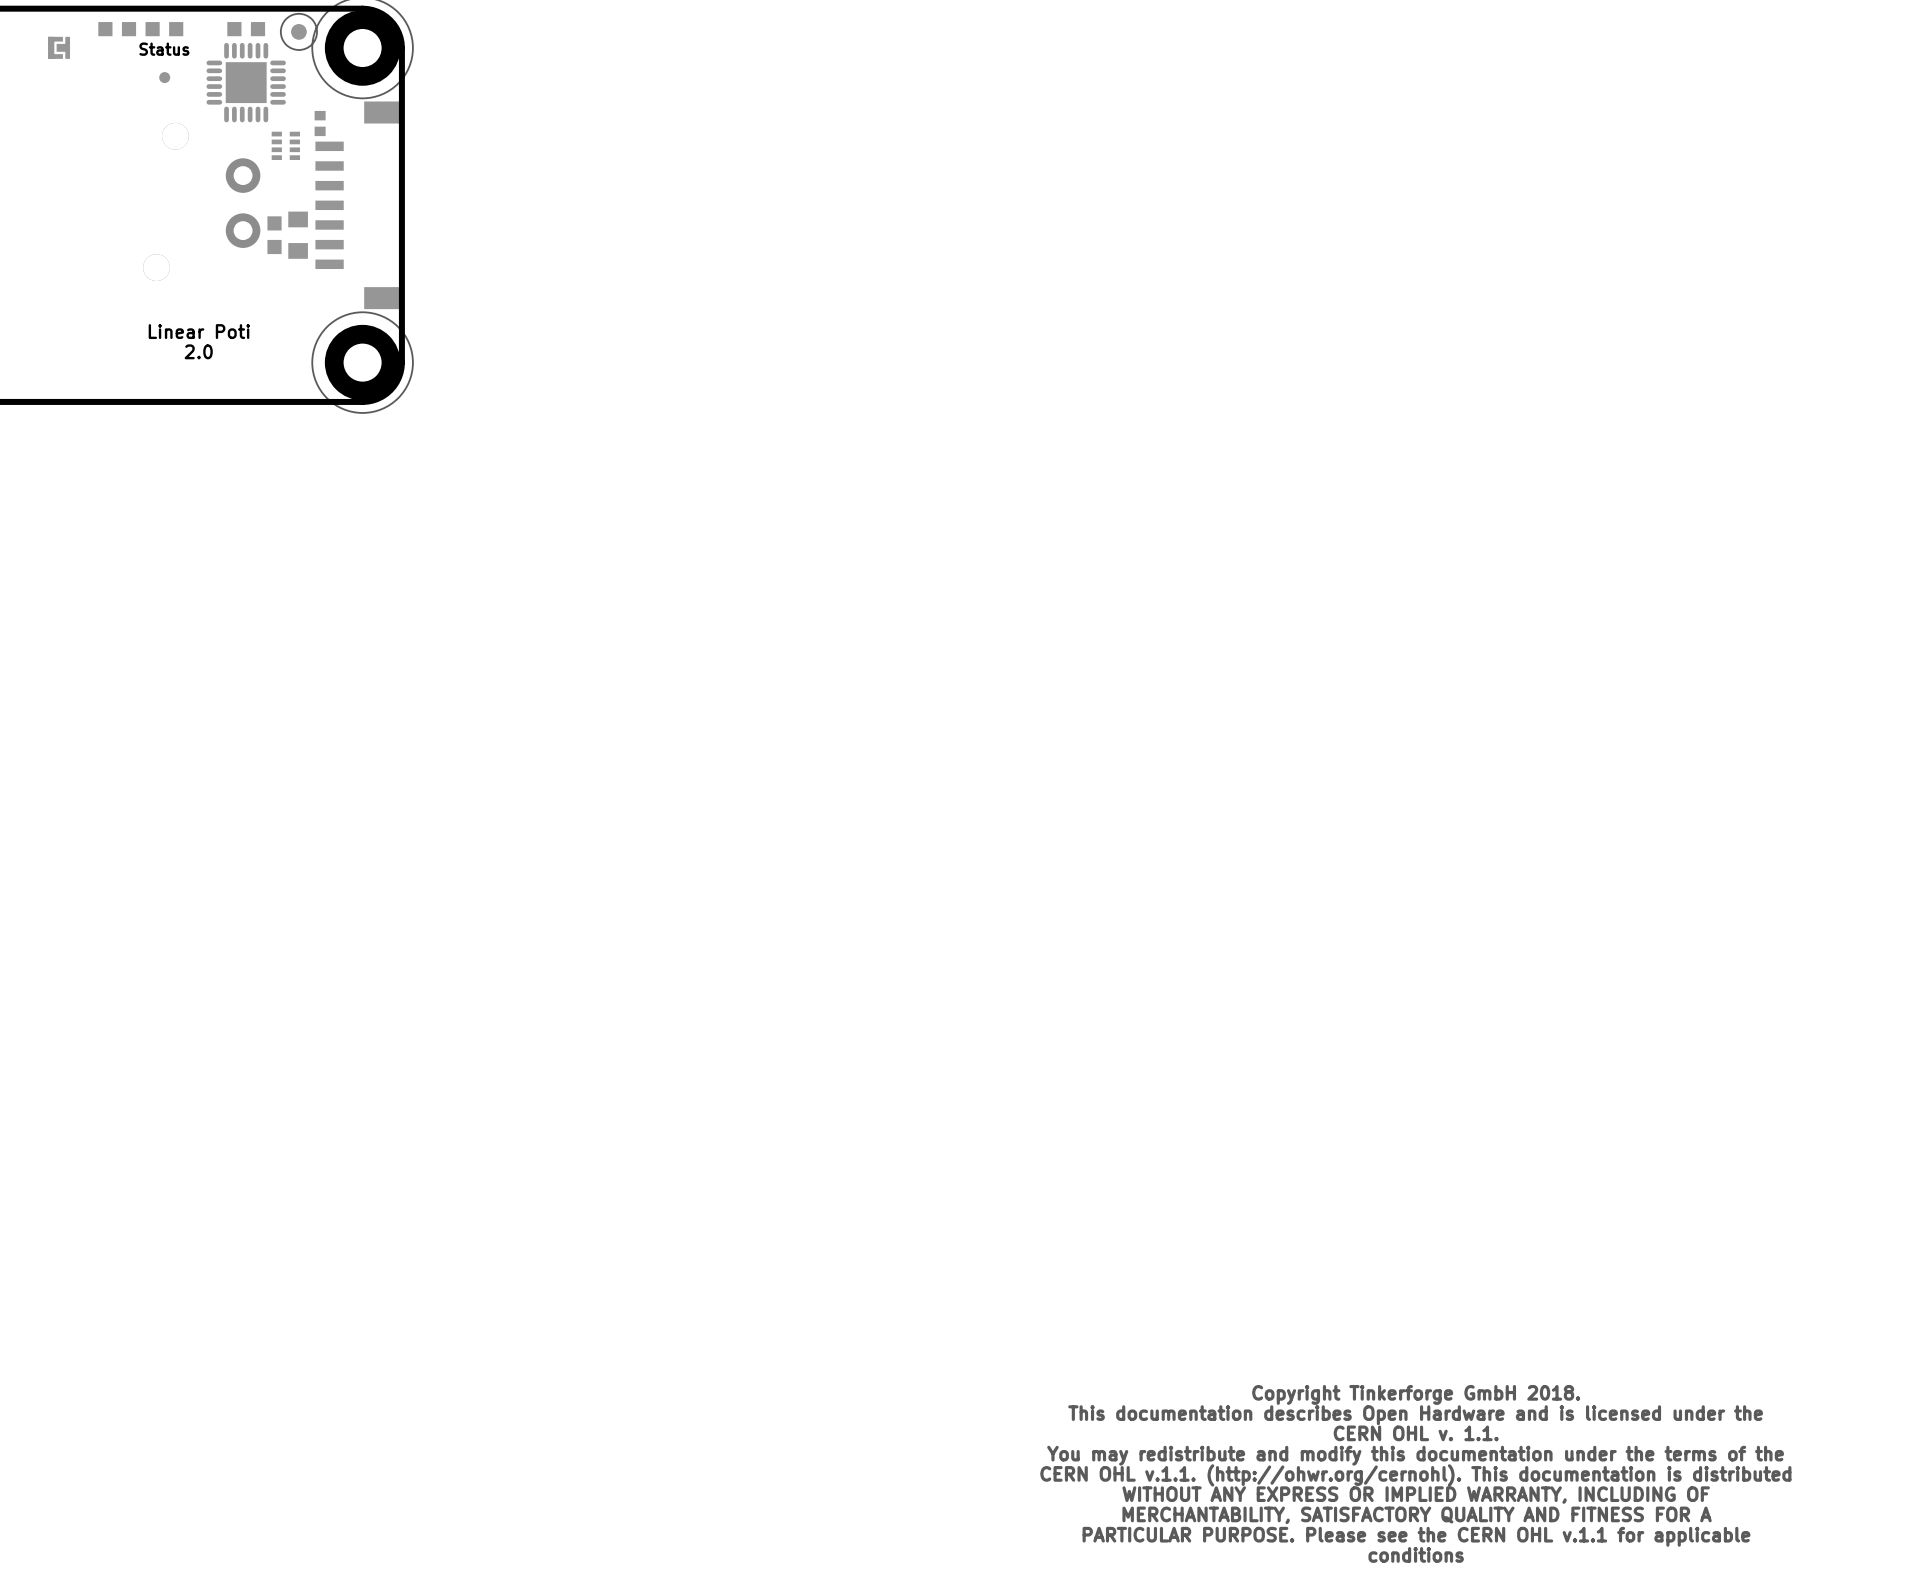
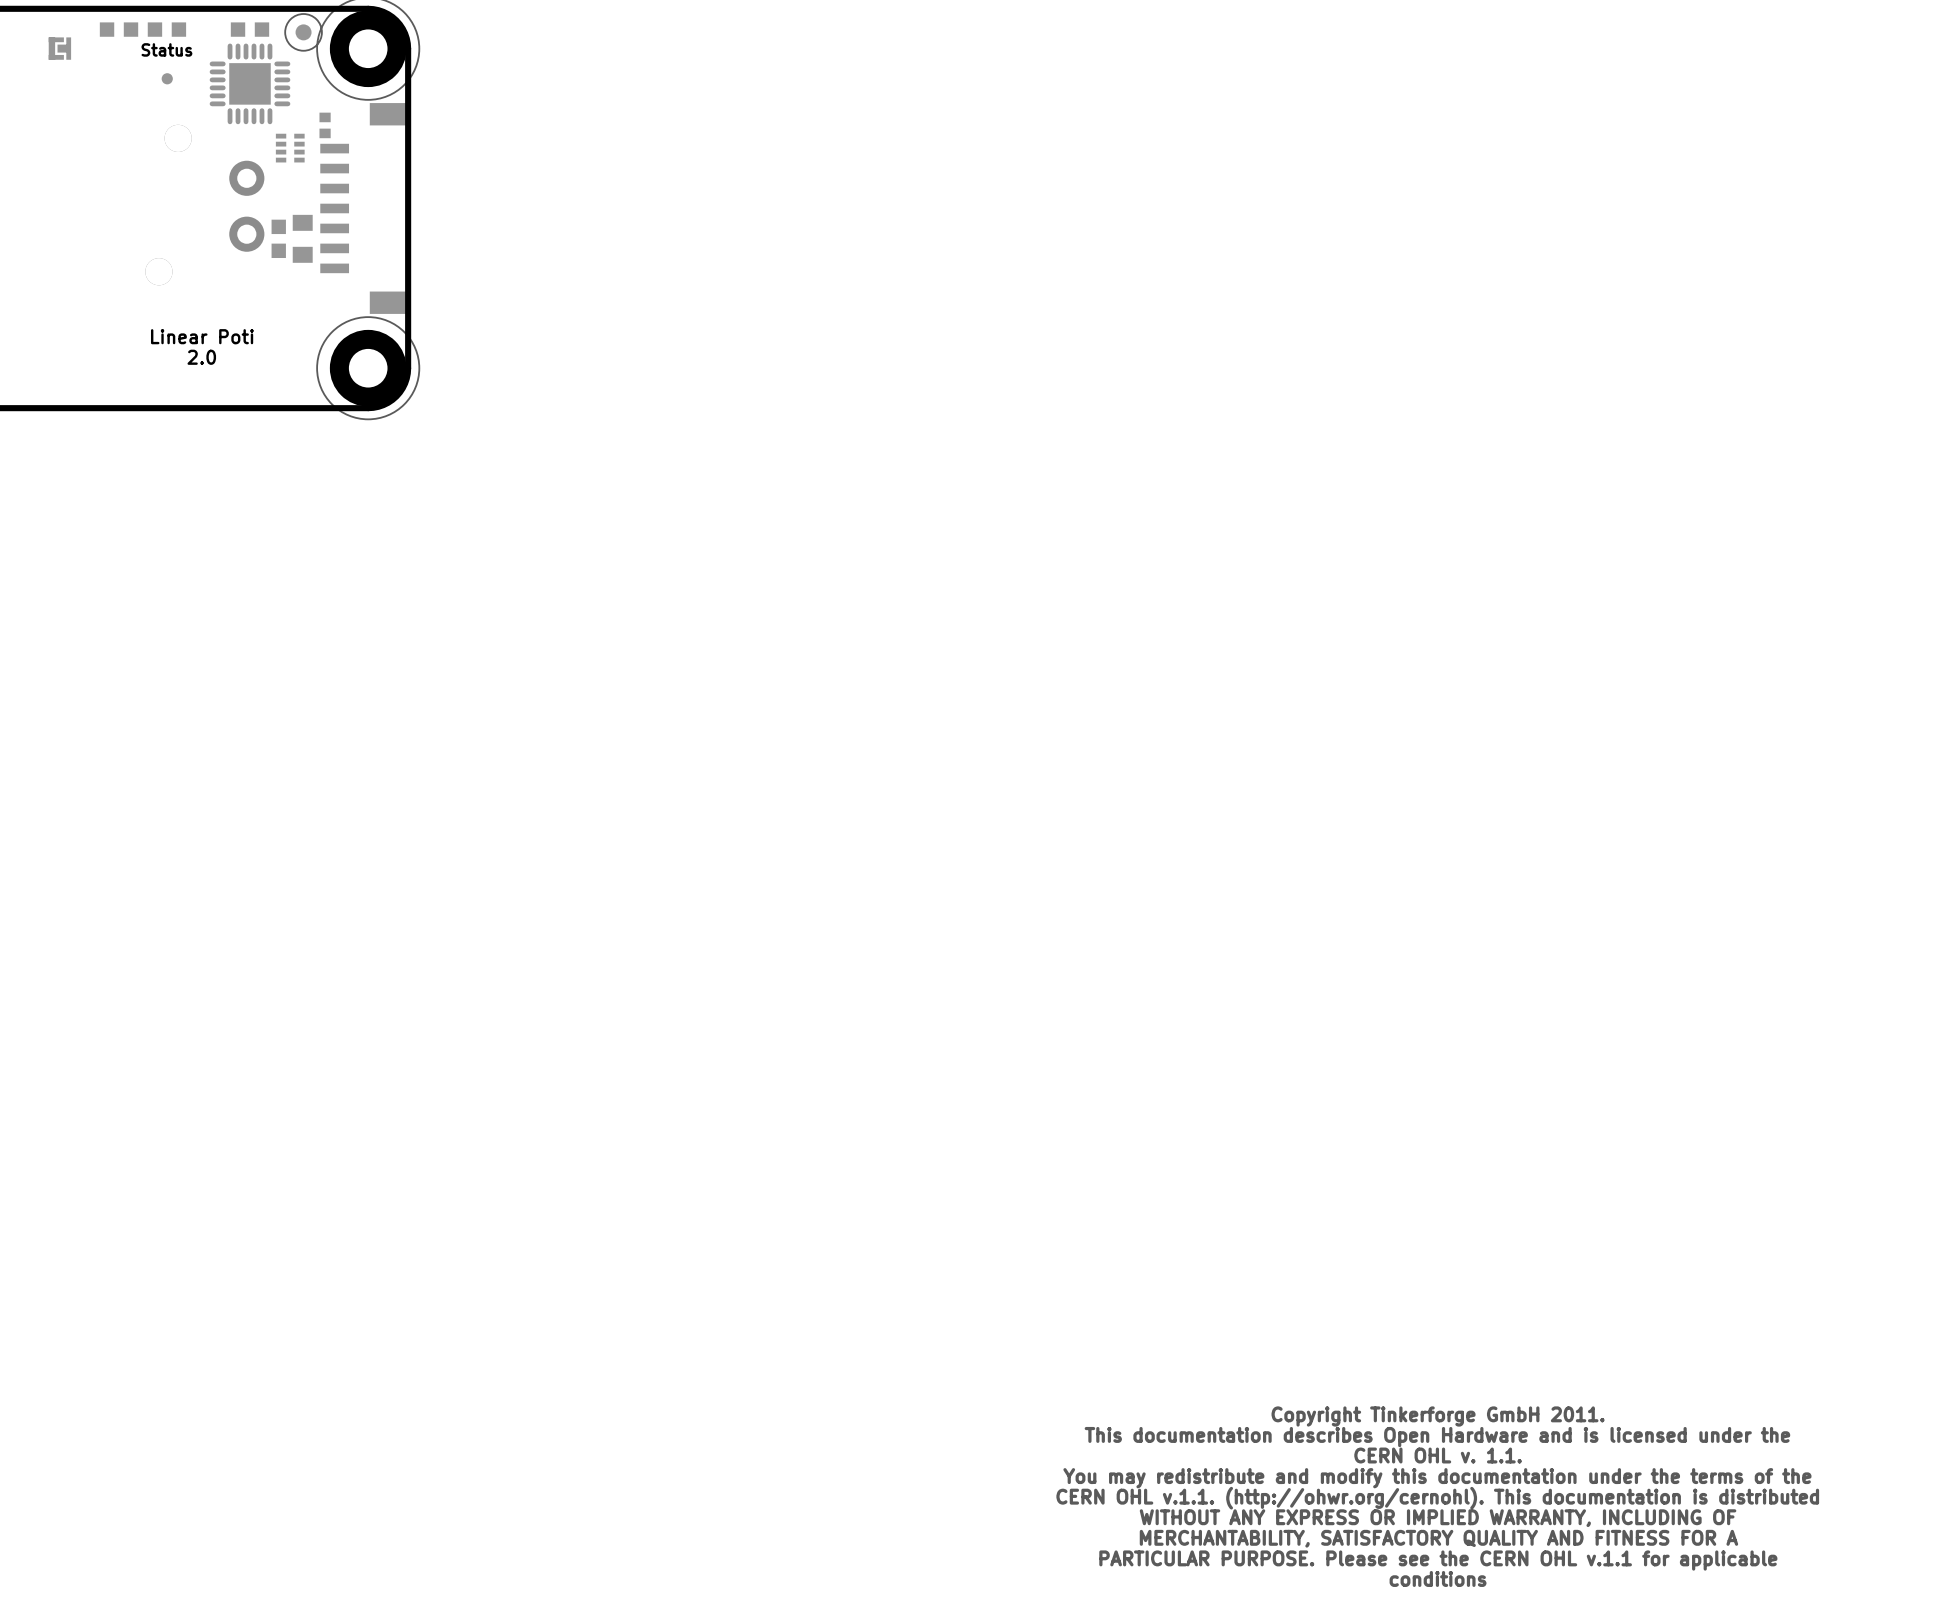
text: Copyright Tinkerforge GmbH 2018. (1416, 1394) -> Copyright Tinkerforge GmbH 2011. (1438, 1416)

